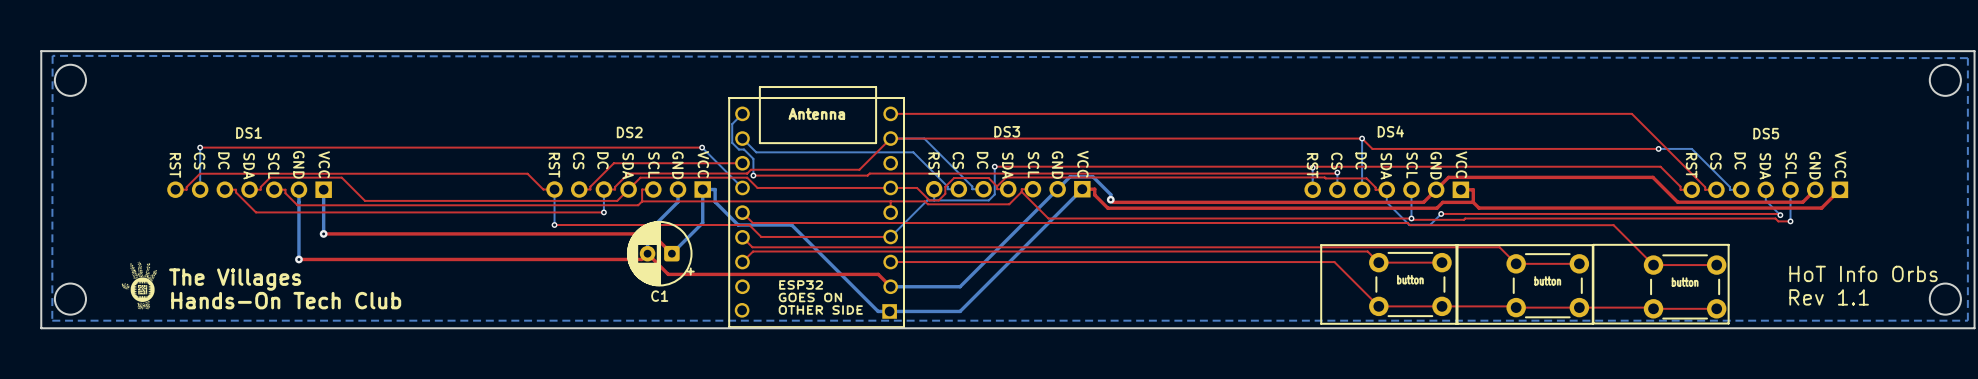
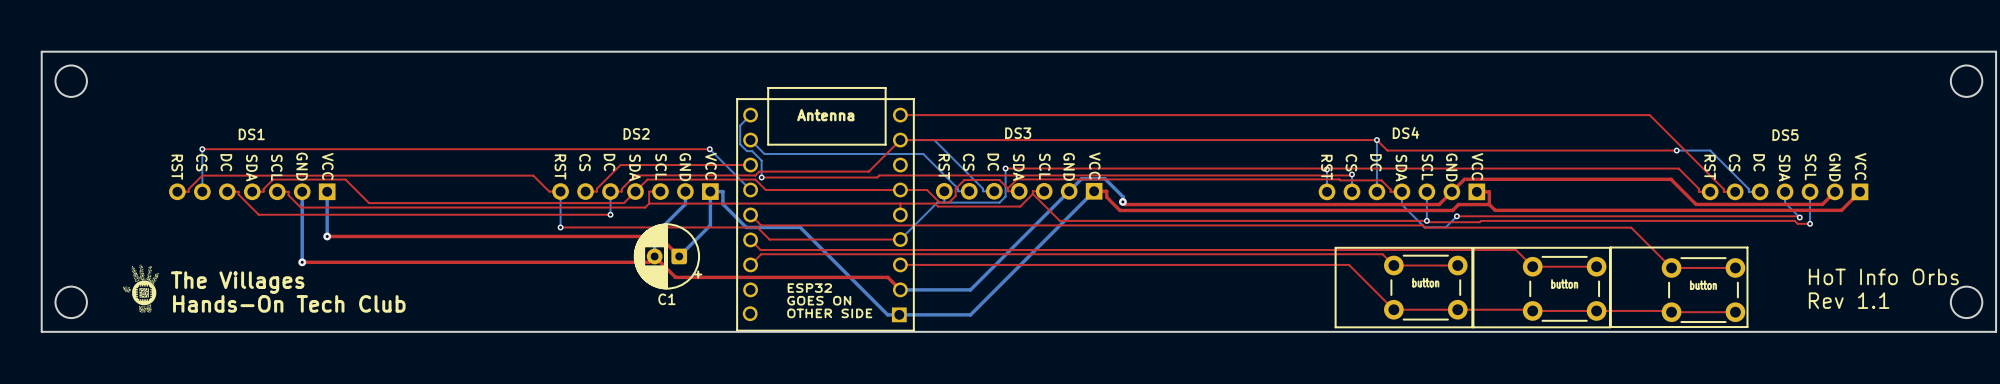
bottom zone outline: (52, 55) (52, 320) (1967, 320) (1967, 58) (52, 55) -> none

